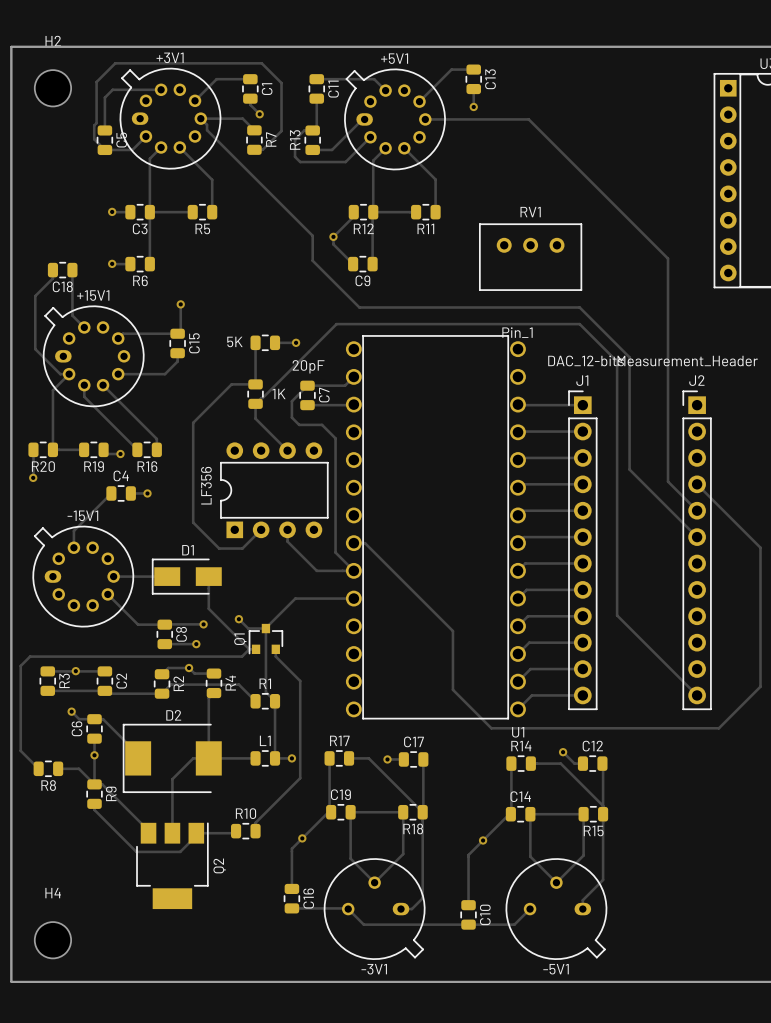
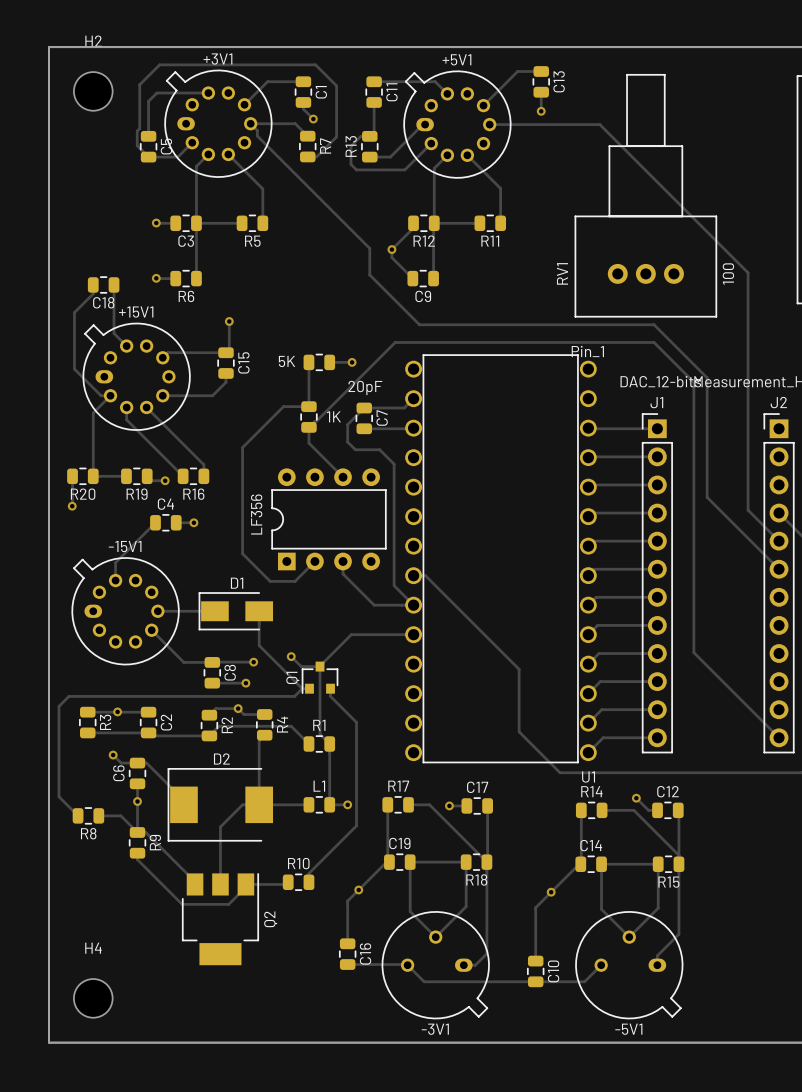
RV1 name position: RV1 (530, 212) -> RV1 (562, 273)
RV1 footprint: [479, 223, 582, 291] -> [574, 74, 717, 318]
RV1 value: none -> 100 (728, 274)

